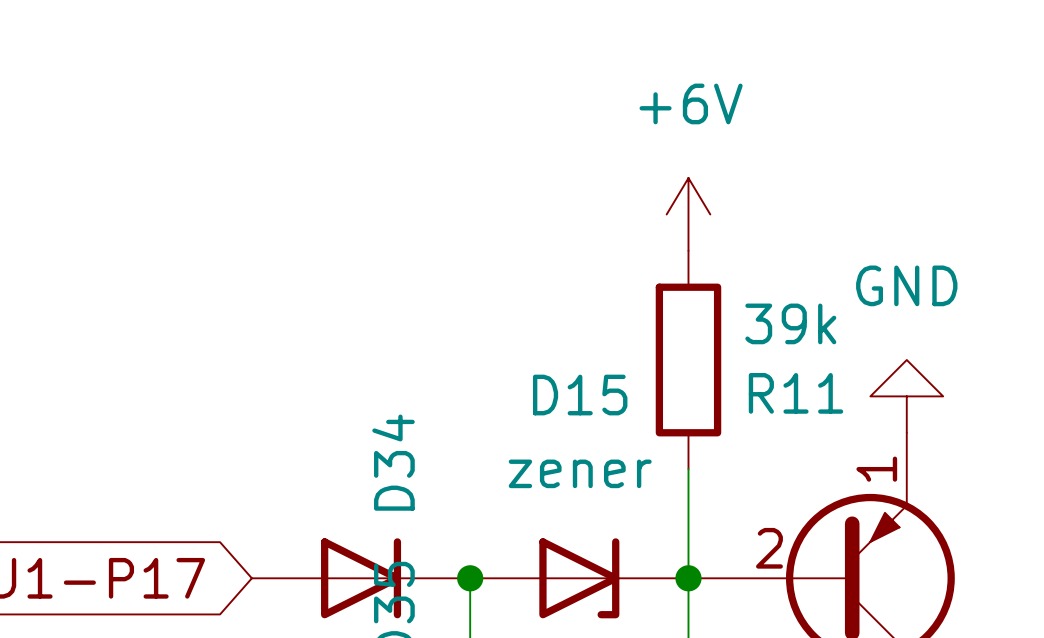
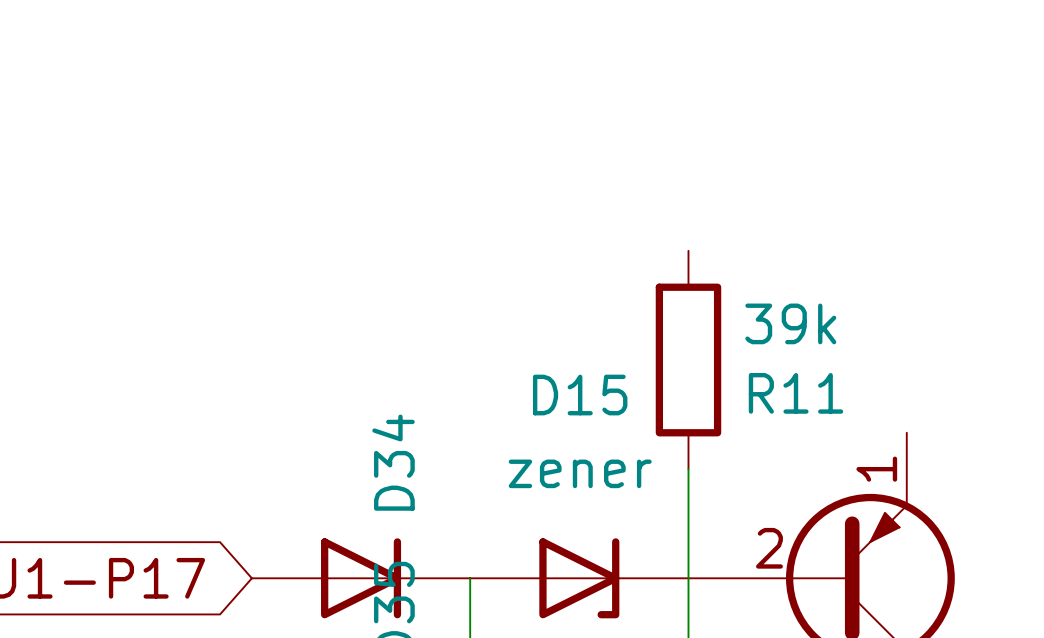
power symbol: +6V (688, 214) -> none
power symbol: GND (906, 396) -> none
junction: (470, 578) -> none
junction: (688, 578) -> none

